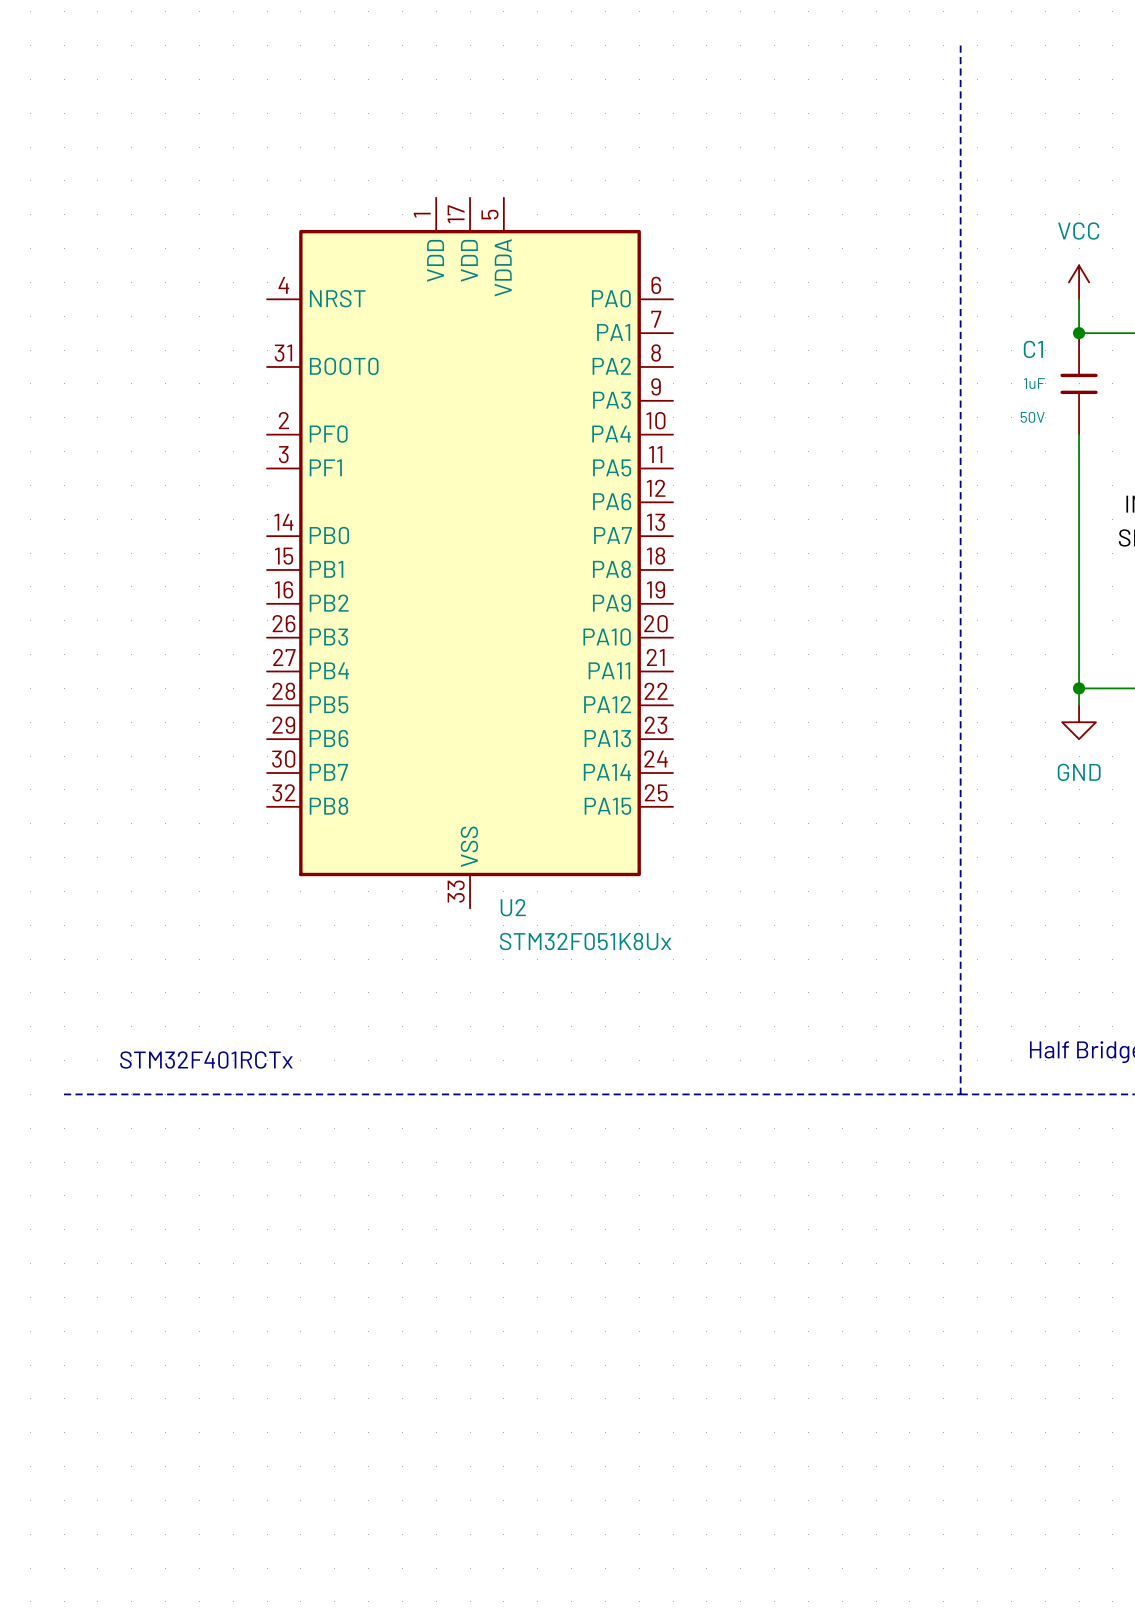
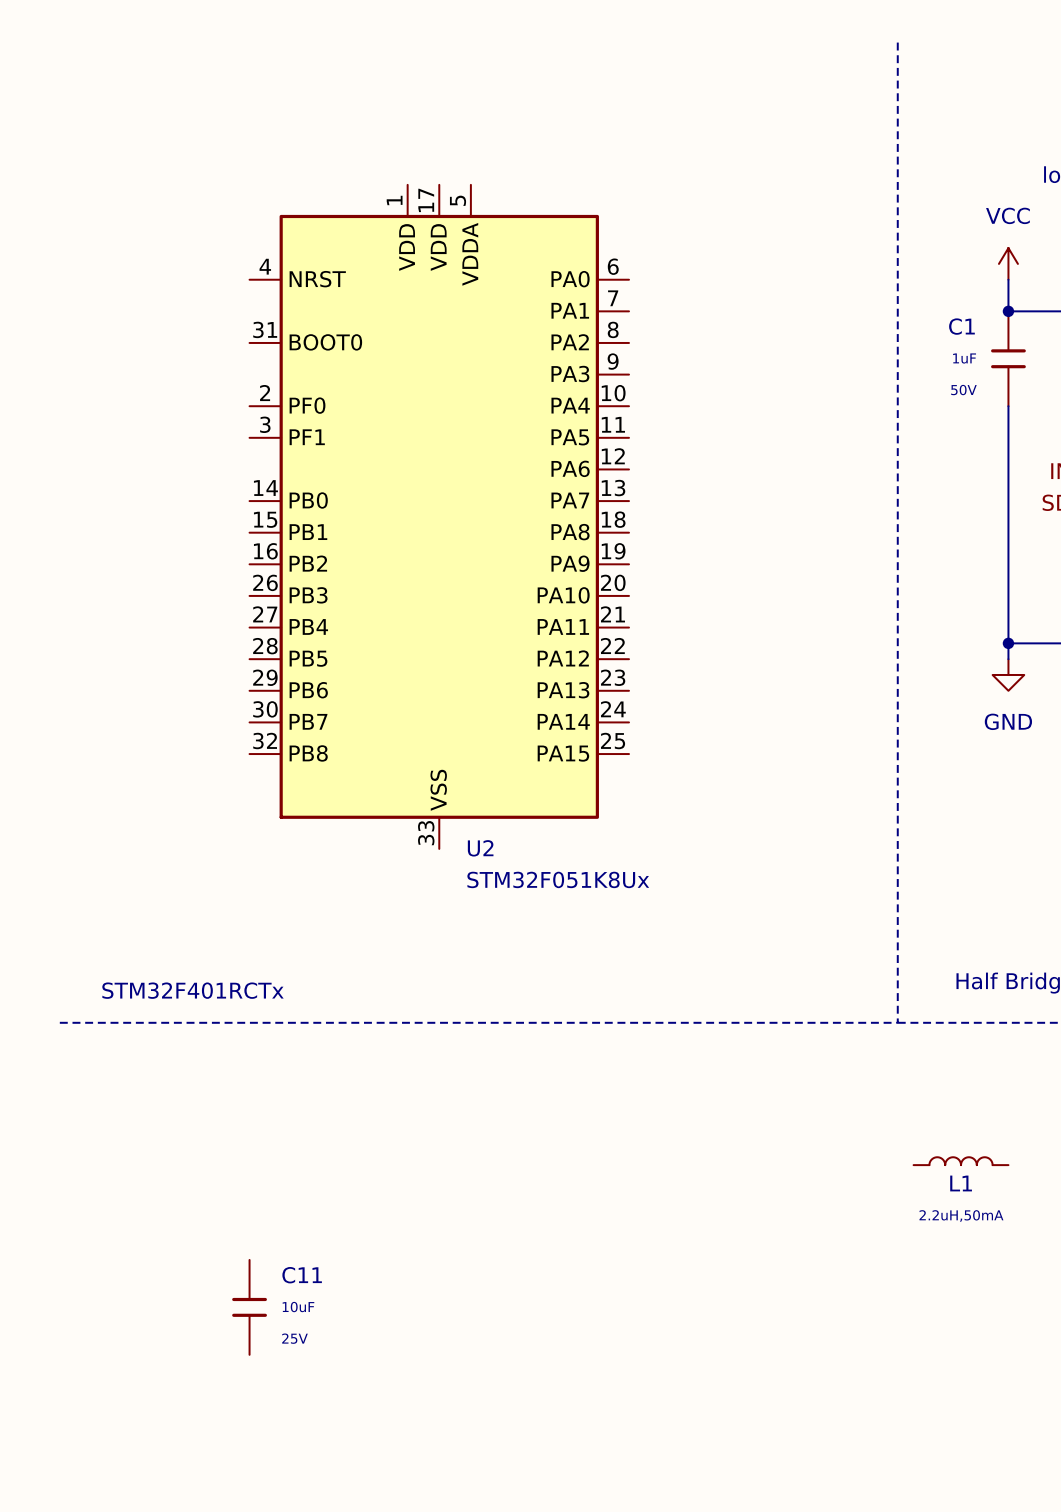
L1: none -> 2.2uH,50mA (961, 1161)
C11: none -> 10uF (249, 1307)

